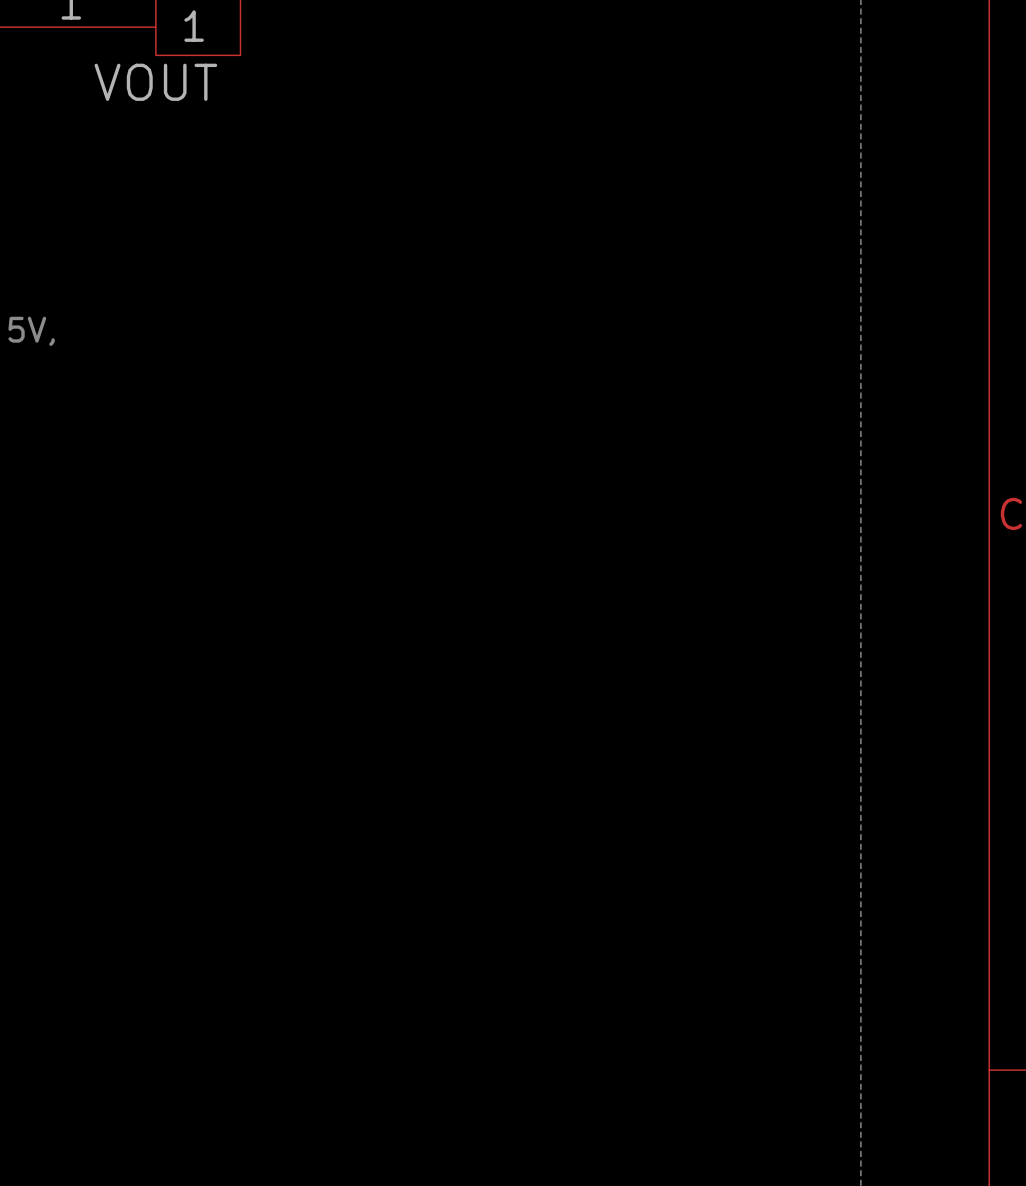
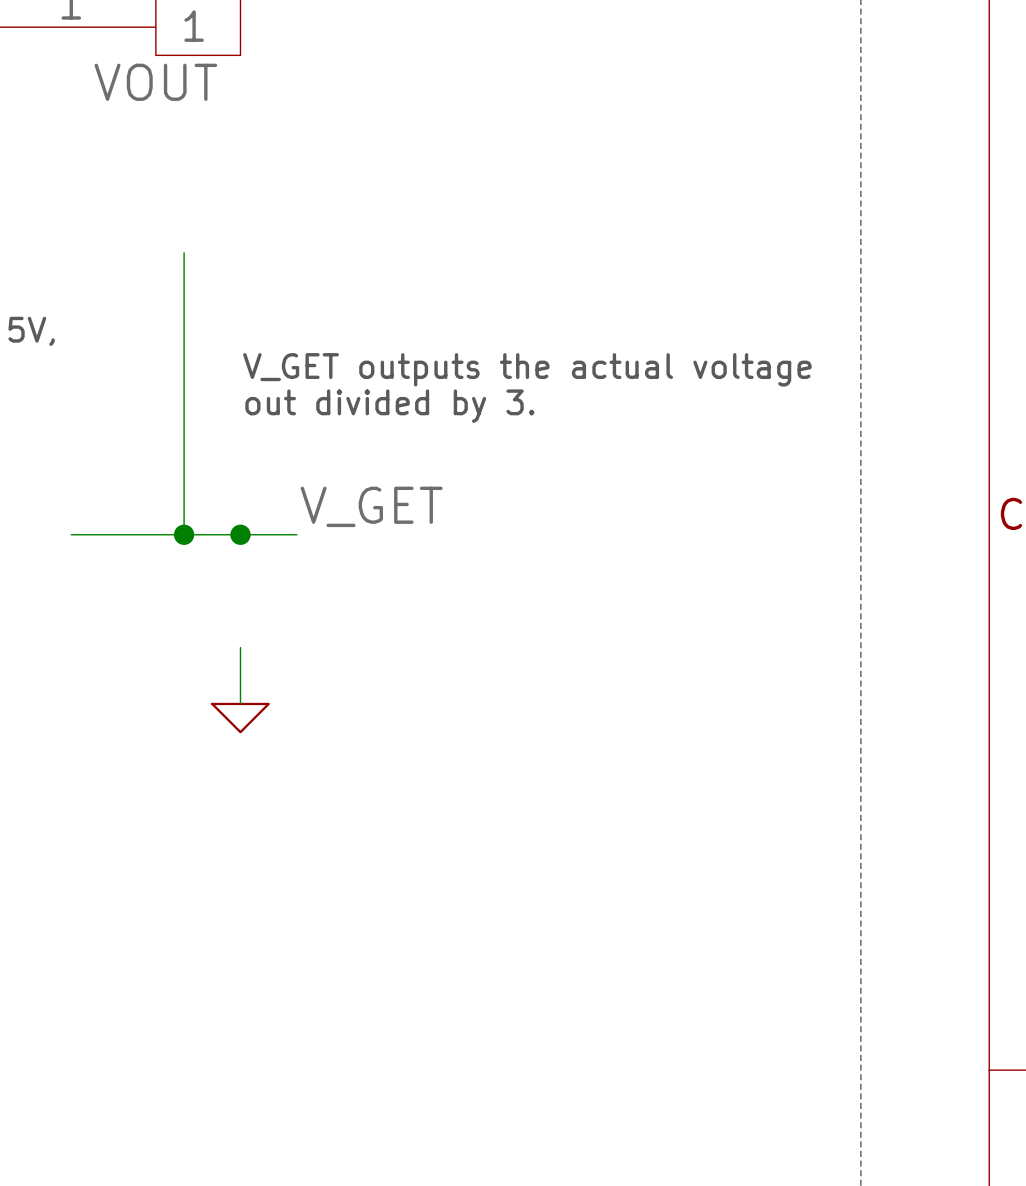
wire: none -> (184, 252) (184, 534)
text: none -> V_GET outputs the actual voltage (527, 369)
text: none -> out divided by 3. (389, 406)
label: none -> V_GET (371, 506)
wire: none -> (71, 534) (296, 534)
junction: none -> (184, 534)
junction: none -> (240, 534)
wire: none -> (240, 647) (240, 703)
power symbol: none -> (240, 718)

